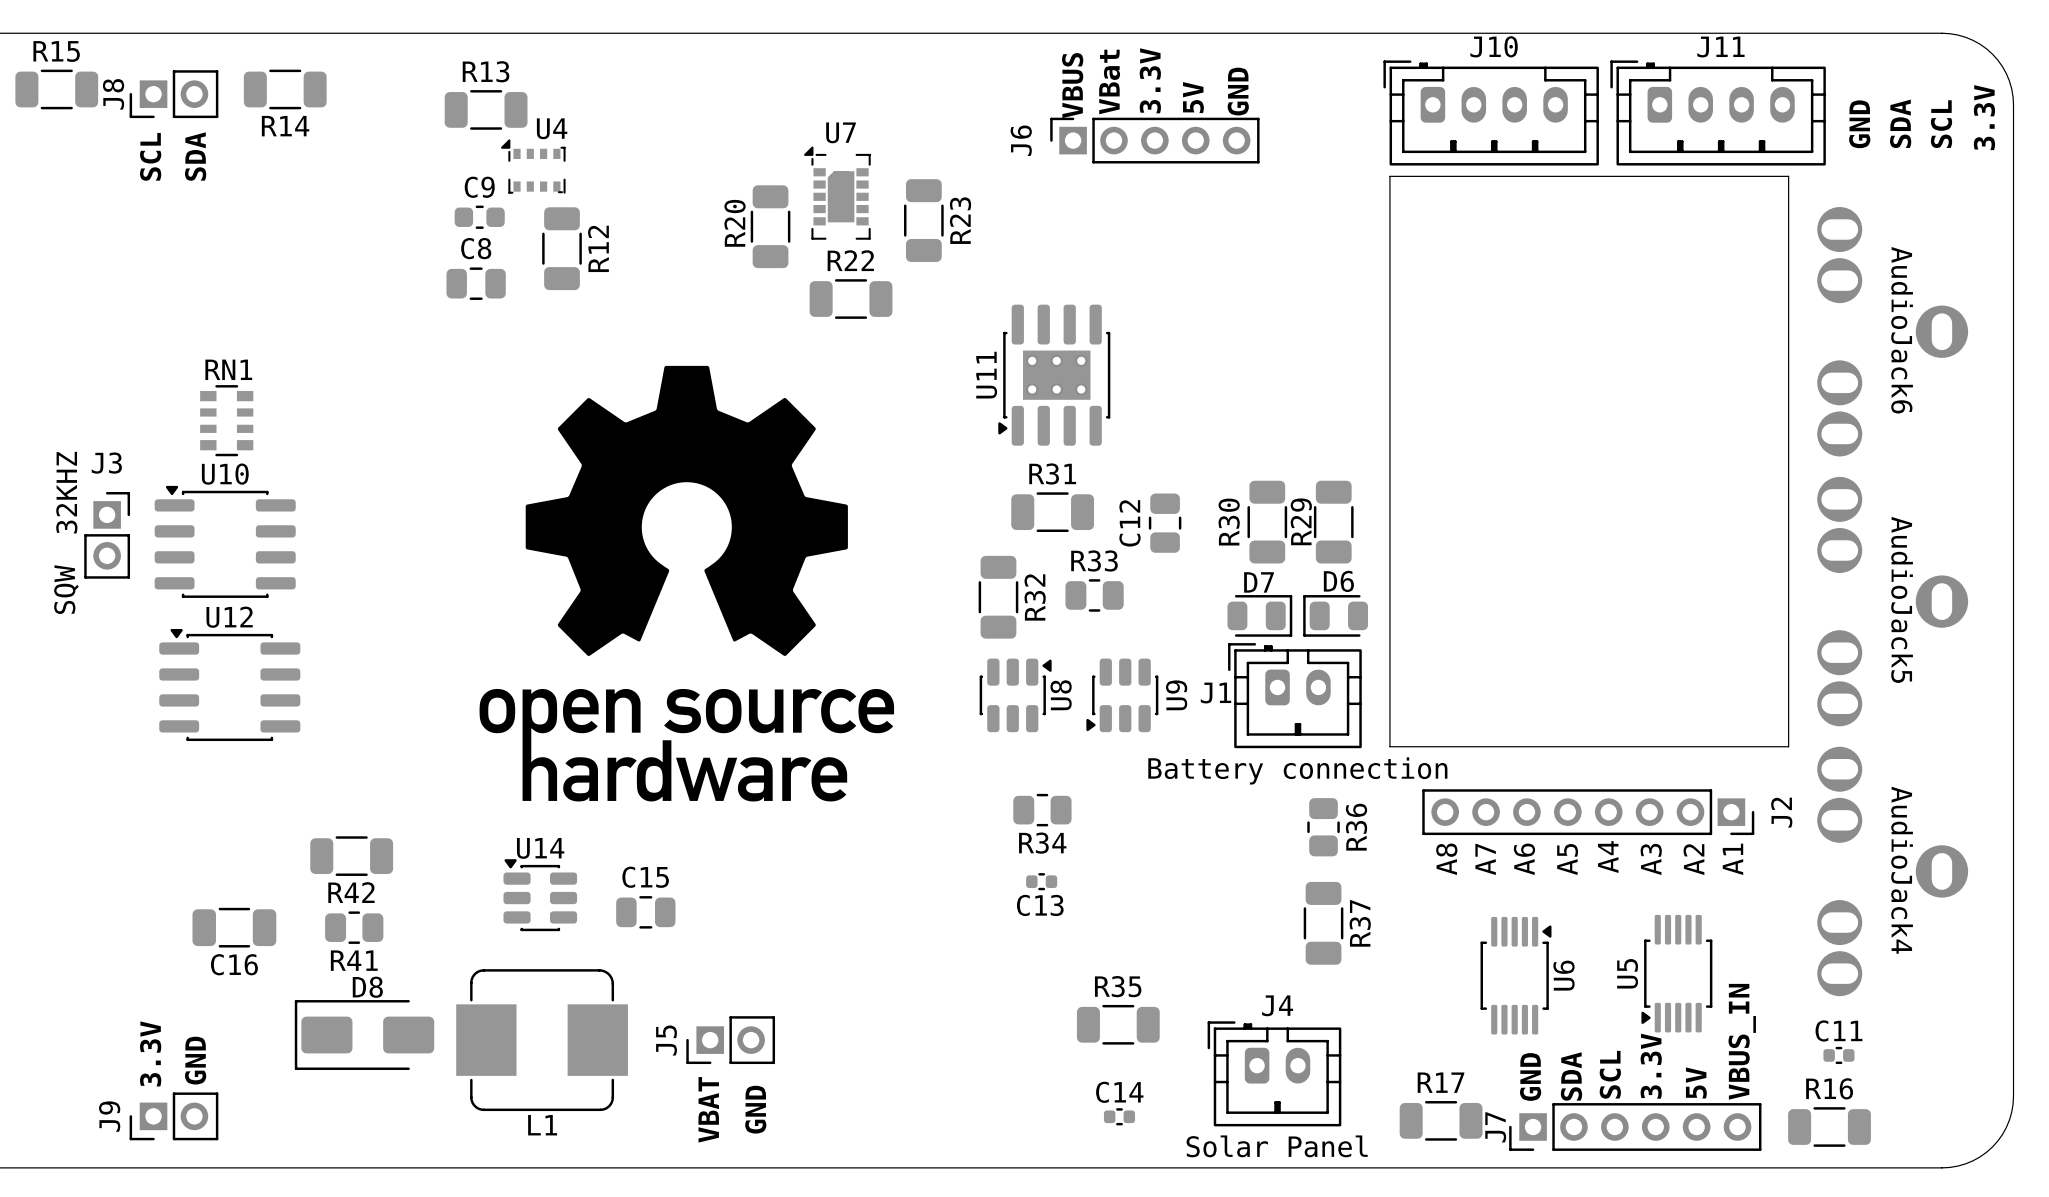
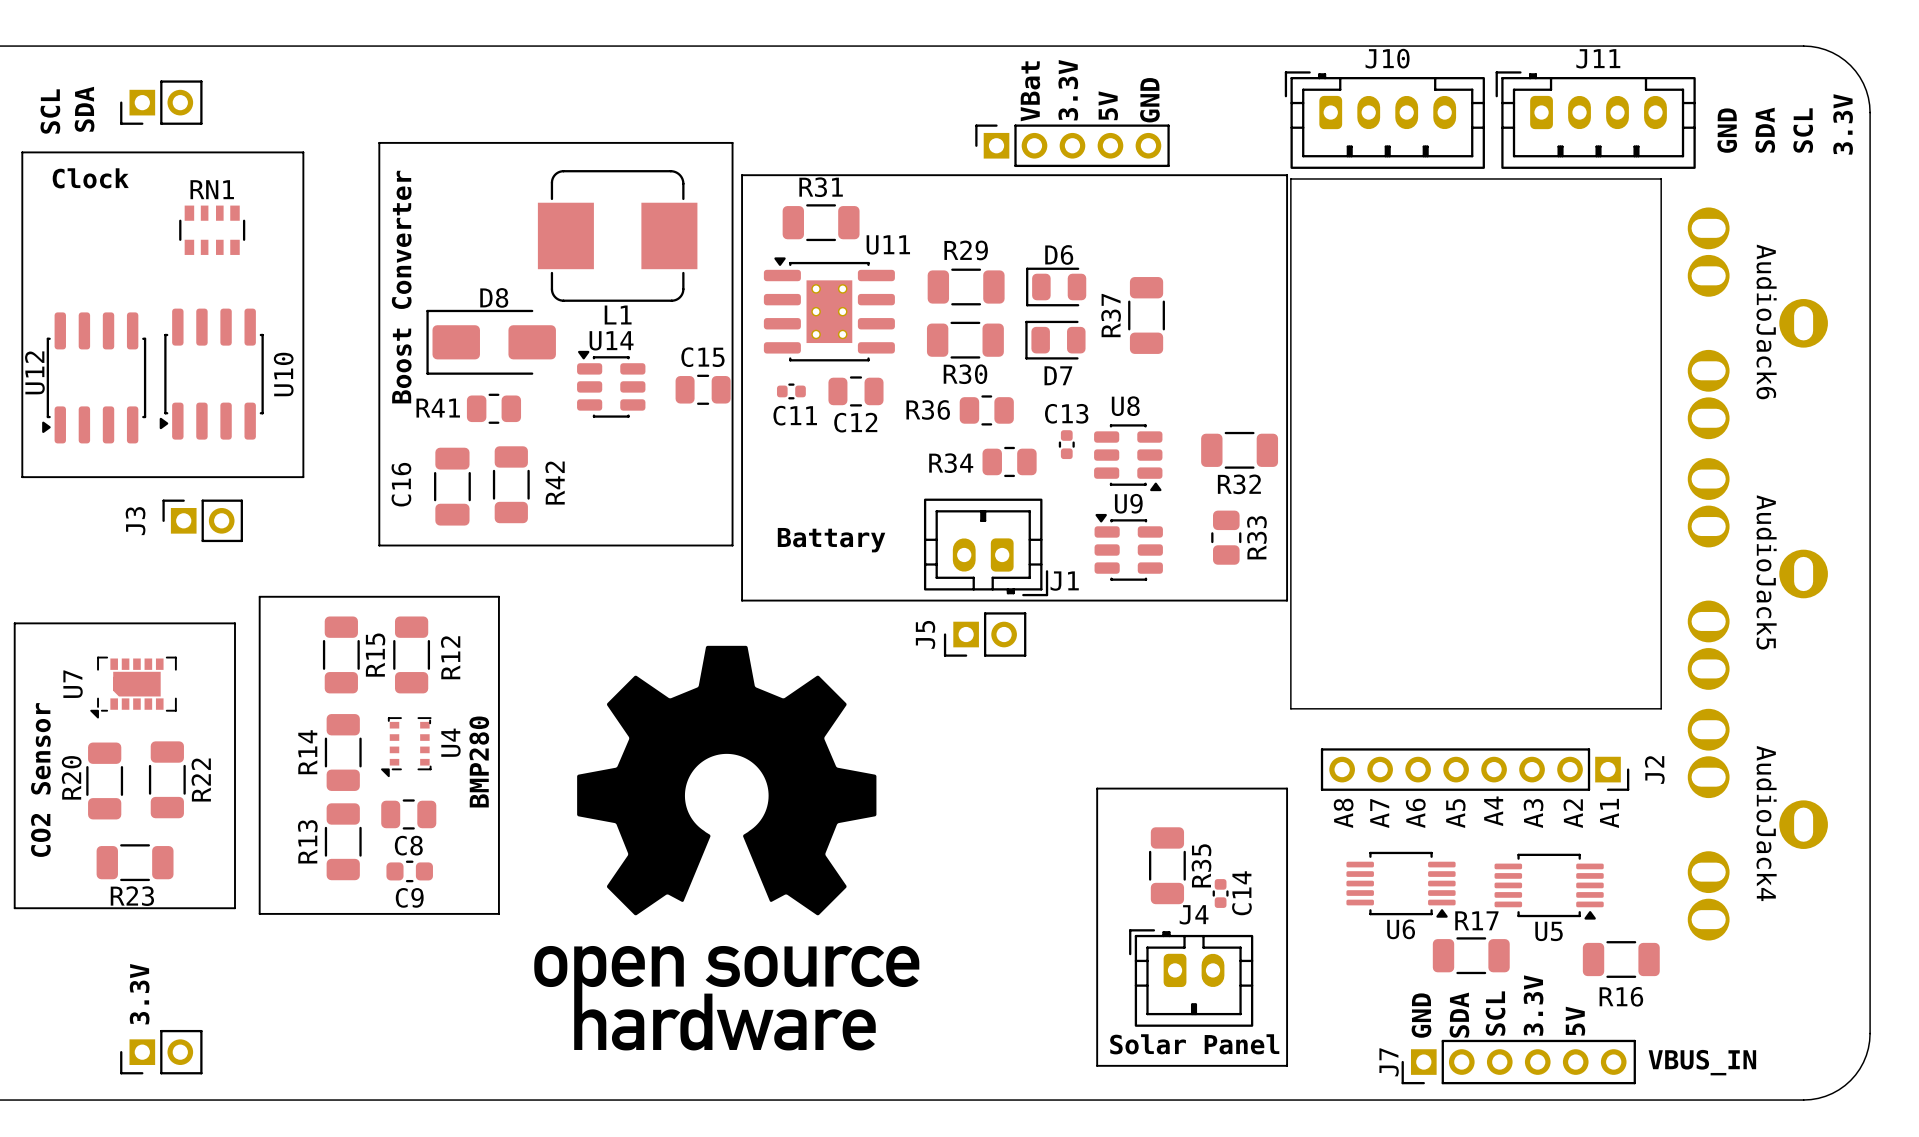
R13 name position: R13 (486, 71) -> R13 (307, 841)
text: VBUS (1072, 85) -> none
R15 rotation: 0° (56, 89) -> 90° clockwise (341, 654)
R15 position: (56, 89) -> (341, 654)
R14 rotation: 0° (285, 89) -> 90° clockwise (343, 752)
R14 position: (285, 89) -> (343, 752)
J8 name: J8 (113, 94) -> none
R13 rotation: 0° (486, 109) -> 90° clockwise (343, 841)
R13 position: (486, 109) -> (343, 841)
U4 name position: U4 (552, 128) -> U4 (450, 742)
line: none -> (379, 142) (732, 142) (732, 545) (379, 545) (379, 142)
J6 name: J6 (1021, 140) -> none
line: none -> (22, 152) (303, 152) (303, 477) (22, 477) (22, 152)
text position: SCL (150, 156) -> SCL (50, 111)
text position: SDA (195, 156) -> SDA (84, 109)
U4 rotation: 0° (533, 166) -> 90° counterclockwise (406, 747)
U4 position: (533, 166) -> (406, 747)
line: none -> (742, 175) (1287, 175) (1287, 600) (742, 600) (742, 175)
text: none -> Clock (90, 178)
C9 name position: C9 (479, 187) -> C9 (409, 897)
U7 rotation: 0° (837, 193) -> 90° counterclockwise (133, 687)
U7 position: (837, 193) -> (133, 687)
C9 position: (479, 217) -> (409, 871)
R23 rotation: 0° (923, 220) -> 90° clockwise (135, 862)
R23 position: (923, 220) -> (135, 862)
R20 position: (770, 226) -> (104, 780)
C8 name position: C8 (476, 248) -> C8 (408, 845)
R12 position: (562, 248) -> (411, 654)
R12 name position: R12 (598, 248) -> R12 (450, 657)
C8 position: (476, 283) -> (408, 814)
text: none -> Boost Converter (401, 287)
R22 rotation: 0° (851, 299) -> 90° clockwise (167, 779)
R22 position: (851, 299) -> (167, 779)
U11 footprint: [998, 304, 1111, 446] -> [763, 257, 895, 362]
U11 name position: U11 (986, 375) -> U11 (888, 244)
RN1 rotation: 0° (226, 420) -> 90° clockwise (212, 230)
RN1 position: (226, 420) -> (212, 230)
U10 name position: U10 (225, 474) -> U10 (283, 374)
text: 32KHZ (66, 492) -> none
drawing position: (686, 510) -> (726, 780)
R31 position: (1052, 512) -> (821, 222)
R30 name position: R30 (1229, 522) -> R30 (965, 374)
R30 rotation: 0° (1267, 522) -> 90° clockwise (965, 340)
R30 position: (1267, 522) -> (965, 340)
R29 rotation: 0° (1333, 522) -> 90° clockwise (966, 286)
R29 position: (1333, 522) -> (966, 286)
C12 name position: C12 (1130, 523) -> C12 (855, 422)
C12 rotation: 0° (1165, 523) -> 90° clockwise (855, 391)
C12 position: (1165, 523) -> (855, 391)
J3 rotation: 0° (107, 535) -> 90° counterclockwise (202, 520)
J3 position: (107, 535) -> (202, 520)
U10 rotation: 0° (225, 541) -> 90° counterclockwise (211, 374)
U10 position: (225, 541) -> (211, 374)
text: none -> Battary (831, 540)
text: SQW (66, 589) -> none
R33 rotation: 0° (1094, 595) -> 90° clockwise (1226, 537)
R33 position: (1094, 595) -> (1226, 537)
R32 rotation: 0° (998, 597) -> 90° clockwise (1239, 450)
R32 position: (998, 597) -> (1239, 450)
D7 rotation: 0° (1259, 615) -> 180° (1055, 340)
D7 position: (1259, 615) -> (1055, 340)
D6 position: (1335, 615) -> (1056, 286)
line: none -> (259, 596) (498, 596) (498, 913) (259, 913) (259, 596)
line: none -> (14, 623) (234, 623) (234, 908) (14, 908) (14, 623)
U12 rotation: 0° (229, 685) -> 90° counterclockwise (94, 377)
U12 position: (229, 685) -> (94, 377)
drawing: [479, 688, 516, 734] -> none
drawing: [562, 688, 599, 734] -> none
drawing: [705, 688, 742, 734] -> none
drawing: [782, 688, 848, 802] -> none
drawing: [858, 688, 895, 734] -> none
U8 rotation: 0° (1015, 695) -> 90° clockwise (1128, 457)
U8 position: (1015, 695) -> (1128, 457)
U8 name position: U8 (1061, 695) -> U8 (1125, 406)
U9 rotation: 0° (1122, 695) -> 90° clockwise (1128, 547)
U9 position: (1122, 695) -> (1128, 547)
U9 name position: U9 (1176, 695) -> U9 (1128, 503)
J1 rotation: 0° (1294, 695) -> 180° (986, 547)
J1 position: (1294, 695) -> (986, 547)
drawing position: (623, 710) -> (667, 966)
drawing position: (682, 711) -> (722, 966)
drawing position: (766, 711) -> (800, 966)
drawing position: (838, 711) -> (867, 966)
drawing position: (539, 744) -> (590, 997)
drawing: [607, 757, 637, 801] -> none
drawing position: (654, 770) -> (696, 1022)
J1 value: Battery connection (1297, 770) -> none
drawing position: (580, 779) -> (628, 1029)
drawing position: (706, 779) -> (745, 1029)
drawing position: (755, 779) -> (790, 1029)
U4 value: none -> BMP280 (479, 761)
R34 position: (1042, 810) -> (1009, 461)
text: none -> CO2 Sensor (40, 779)
R36 rotation: 0° (1323, 827) -> 90° clockwise (986, 410)
R36 position: (1323, 827) -> (986, 410)
R36 name position: R36 (1356, 827) -> R36 (928, 409)
line: none -> (1097, 788) (1287, 788) (1287, 1065) (1097, 1065) (1097, 788)
R34 name position: R34 (1042, 843) -> R34 (951, 463)
R42 rotation: 0° (351, 856) -> 90° clockwise (511, 484)
R42 position: (351, 856) -> (511, 484)
C13 rotation: 0° (1041, 881) -> 90° clockwise (1066, 444)
C13 position: (1041, 881) -> (1066, 444)
R42 name position: R42 (351, 892) -> R42 (555, 483)
U14 position: (540, 895) -> (611, 384)
C15 position: (645, 912) -> (703, 389)
R37 position: (1323, 923) -> (1146, 315)
R37 name position: R37 (1360, 923) -> R37 (1111, 315)
C16 rotation: 0° (234, 927) -> 90° clockwise (452, 486)
C16 position: (234, 927) -> (452, 486)
R41 position: (354, 927) -> (493, 408)
R41 name position: R41 (354, 960) -> R41 (438, 408)
U5 rotation: 0° (1676, 973) -> 90° counterclockwise (1549, 886)
U6 rotation: 0° (1516, 975) -> 90° clockwise (1401, 884)
drawing: none -> [534, 945, 568, 988]
drawing: none -> [611, 945, 645, 988]
drawing: none -> [744, 945, 778, 988]
drawing: none -> [815, 945, 876, 1051]
drawing: none -> [886, 945, 920, 988]
R35 rotation: 0° (1118, 1024) -> 90° clockwise (1167, 865)
R35 position: (1118, 1024) -> (1167, 865)
C11 name position: C11 (1838, 1030) -> C11 (795, 415)
D8 position: (364, 1035) -> (491, 342)
L1 position: (542, 1040) -> (617, 235)
J5 position: (730, 1040) -> (985, 634)
text rotation: 0° (1742, 1041) -> 90° clockwise (1702, 1062)
C11 position: (1838, 1055) -> (791, 391)
text: GND (195, 1060) -> none
drawing: none -> [653, 1009, 681, 1050]
J4 position: (1274, 1073) -> (1191, 978)
R17 name position: R17 (1441, 1082) -> R17 (1476, 920)
R16 name position: R16 (1829, 1088) -> R16 (1621, 996)
text: none -> Solar Panel (1194, 1044)
text: VBAT (708, 1109) -> none
text: GND (755, 1109) -> none
J9 name: J9 (109, 1116) -> none
C14 rotation: 0° (1119, 1116) -> 90° clockwise (1220, 893)
C14 position: (1119, 1116) -> (1220, 893)
R17 position: (1441, 1120) -> (1471, 955)
R16 position: (1829, 1127) -> (1621, 959)
J4 value: Solar Panel (1277, 1146) -> none

